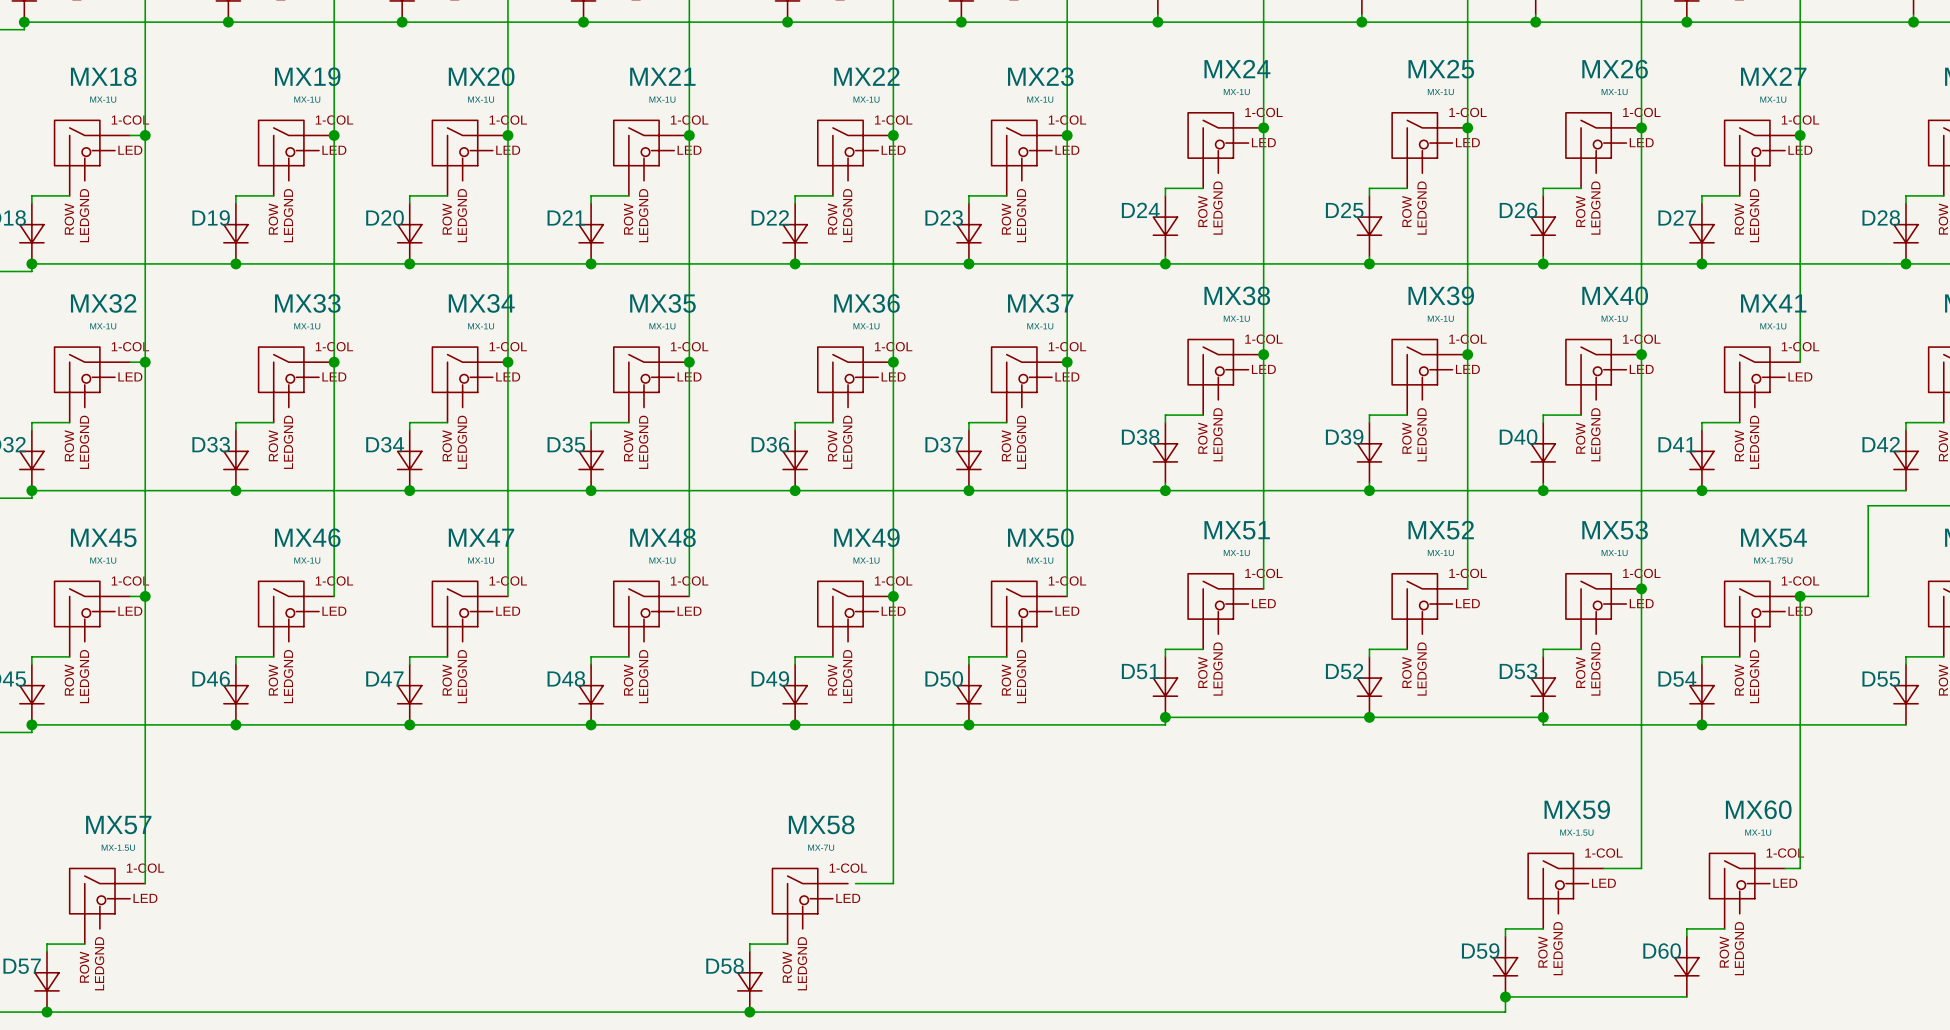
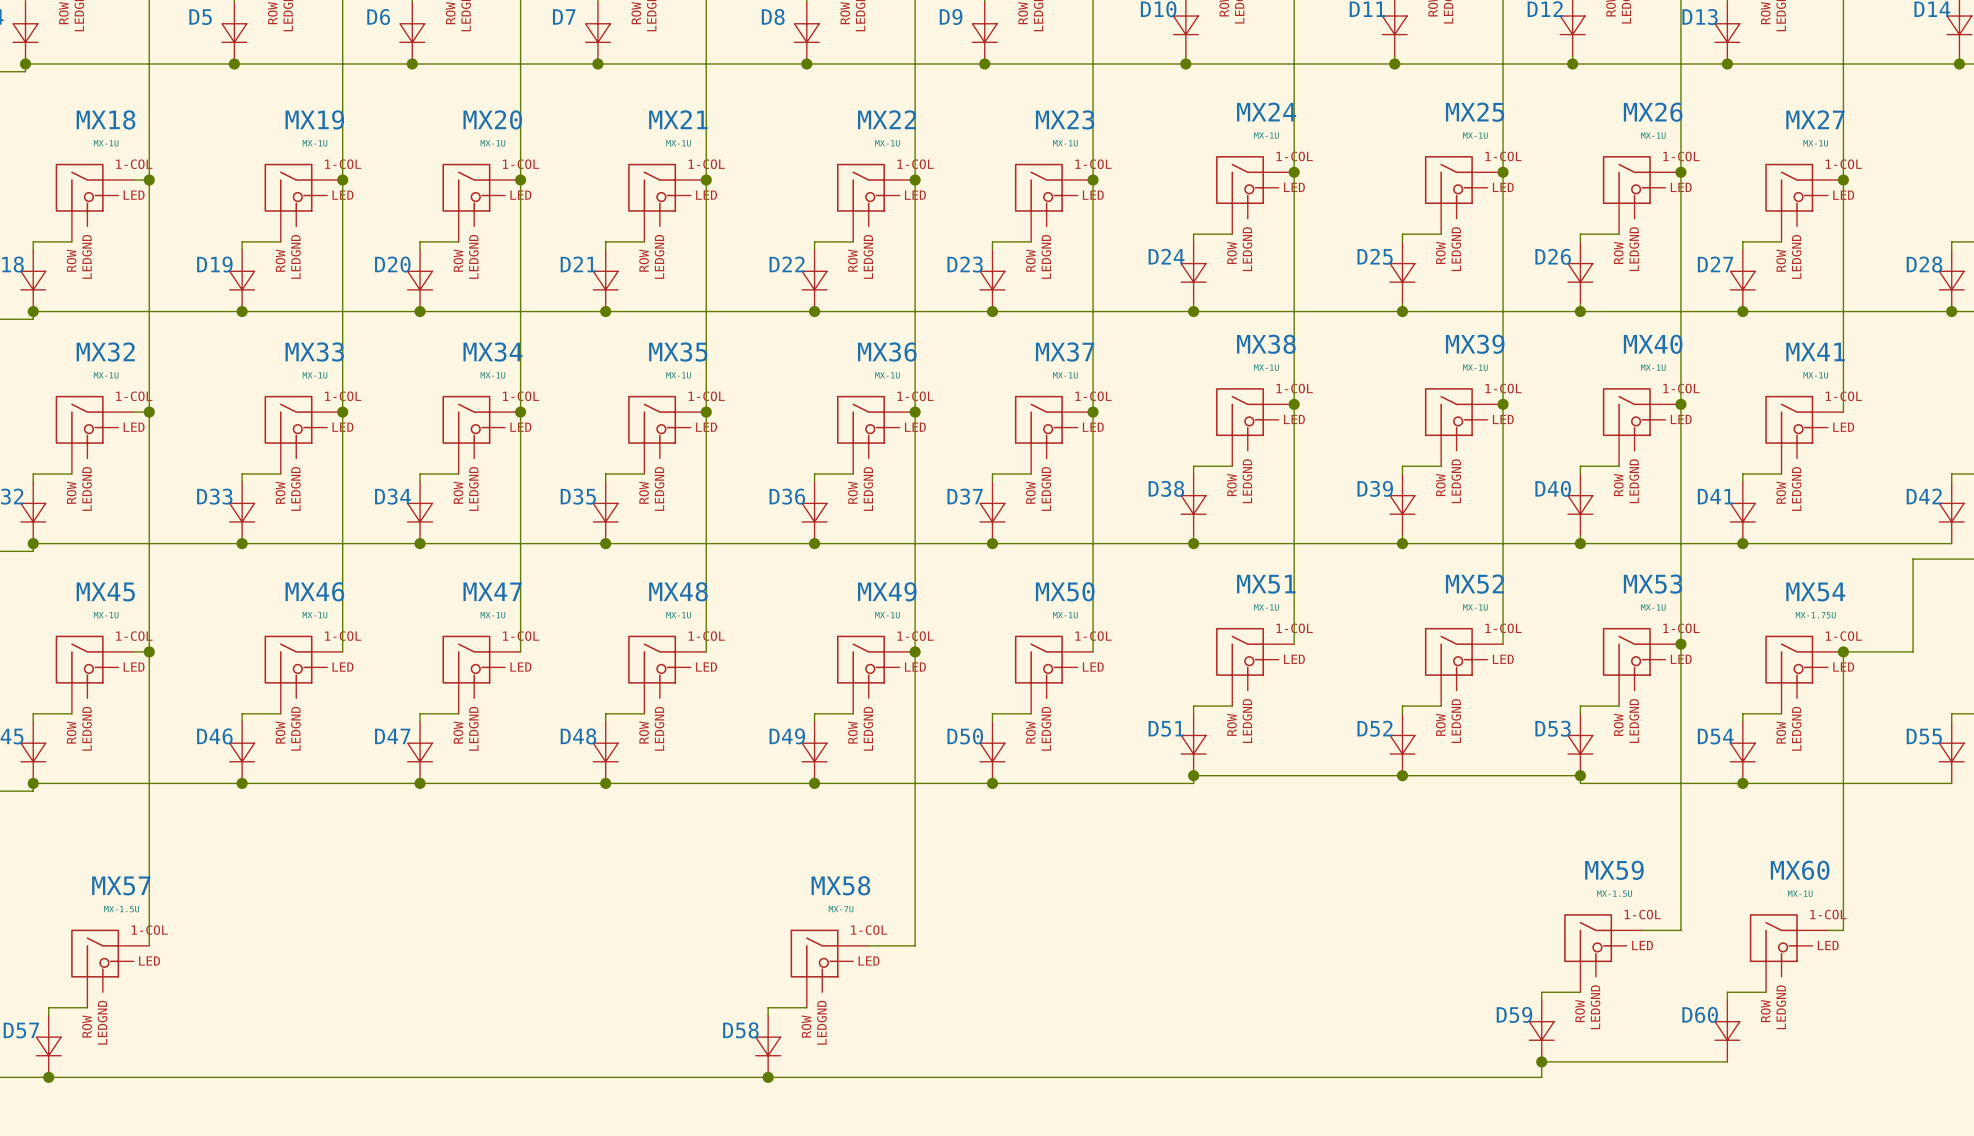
wire: none -> (868, 945) (876, 945)

